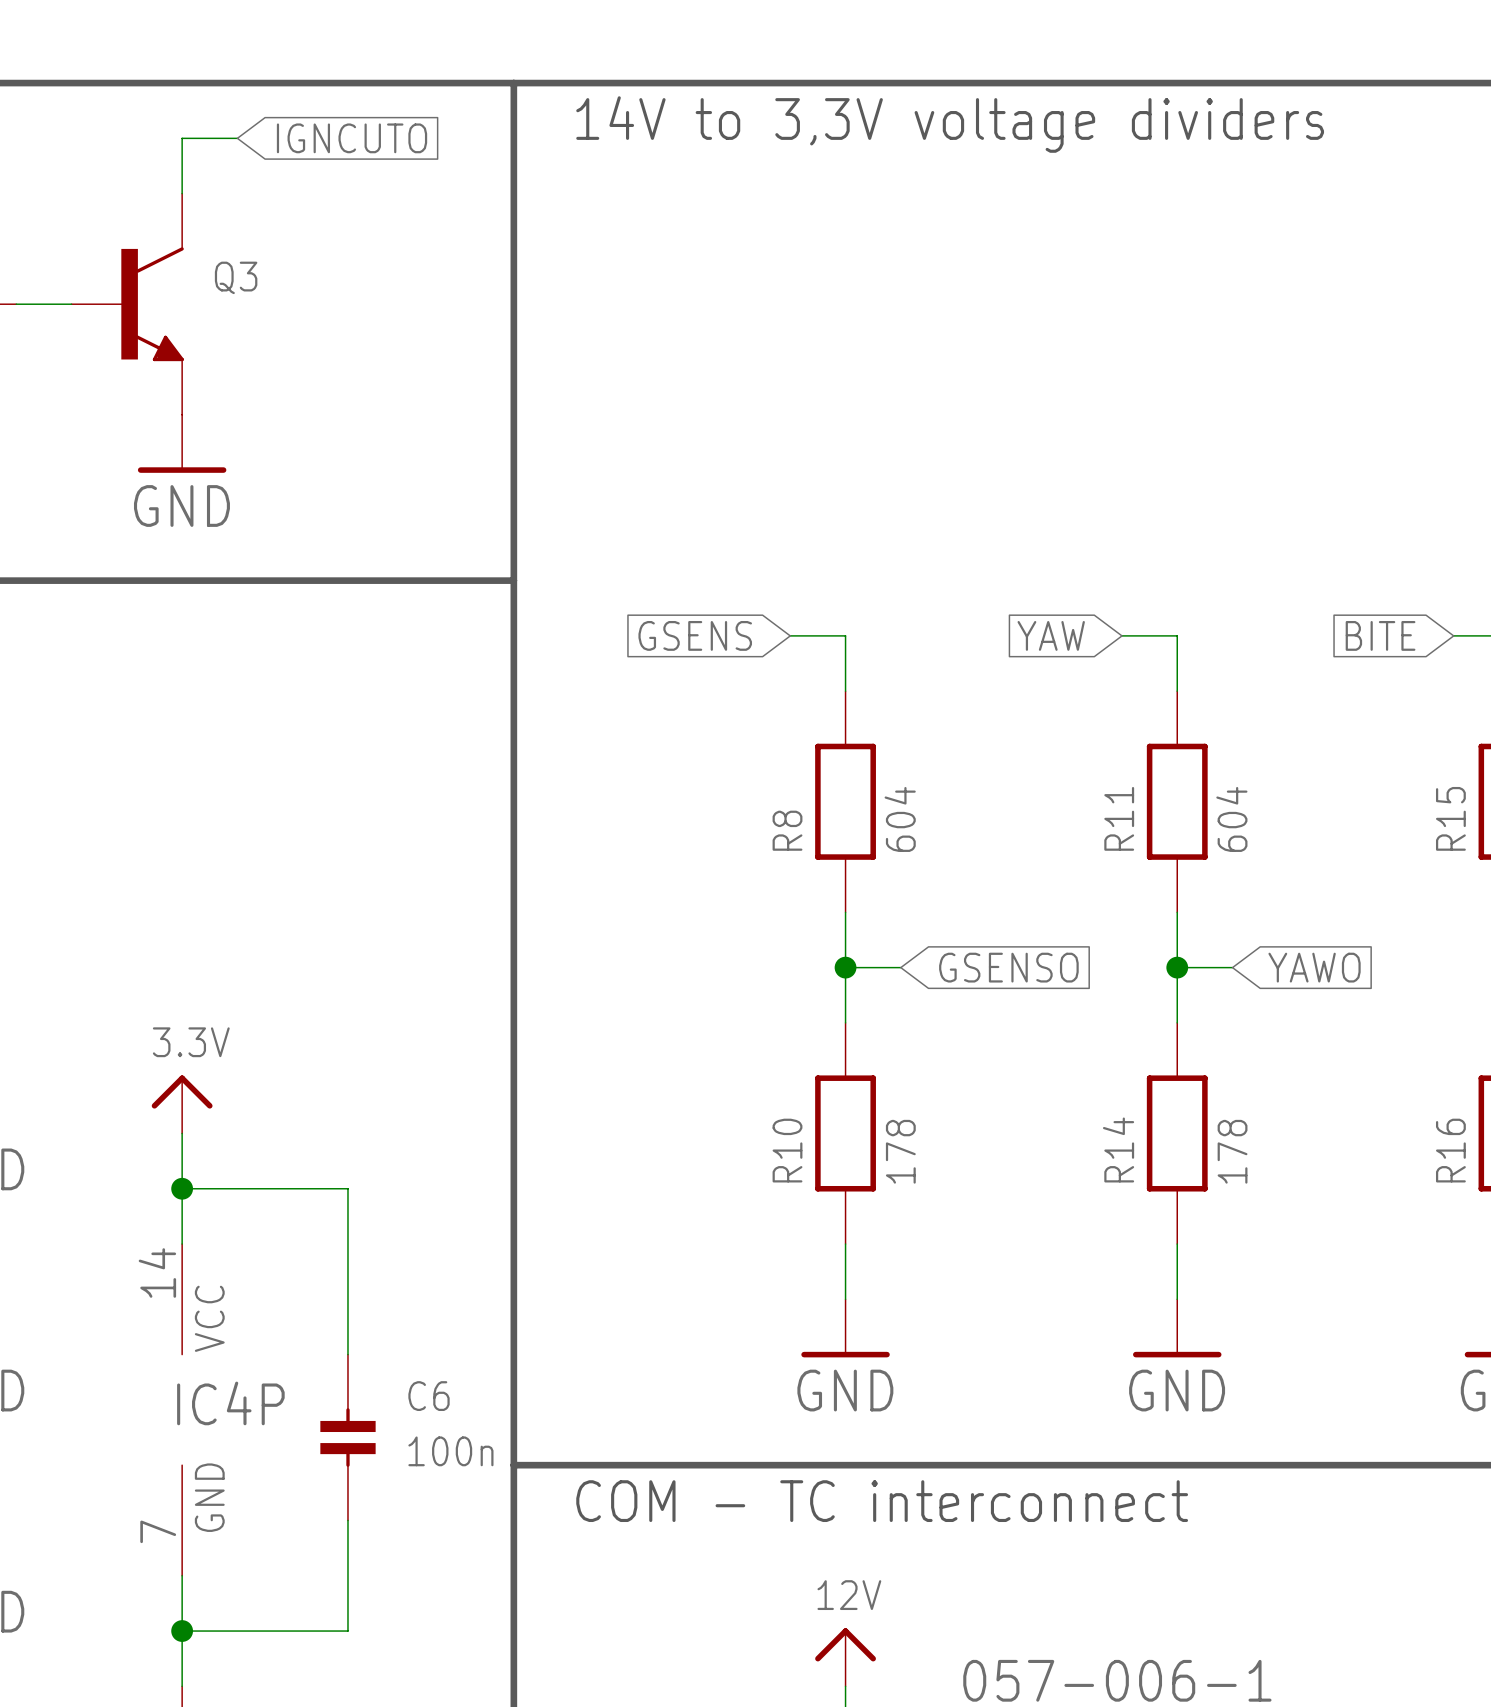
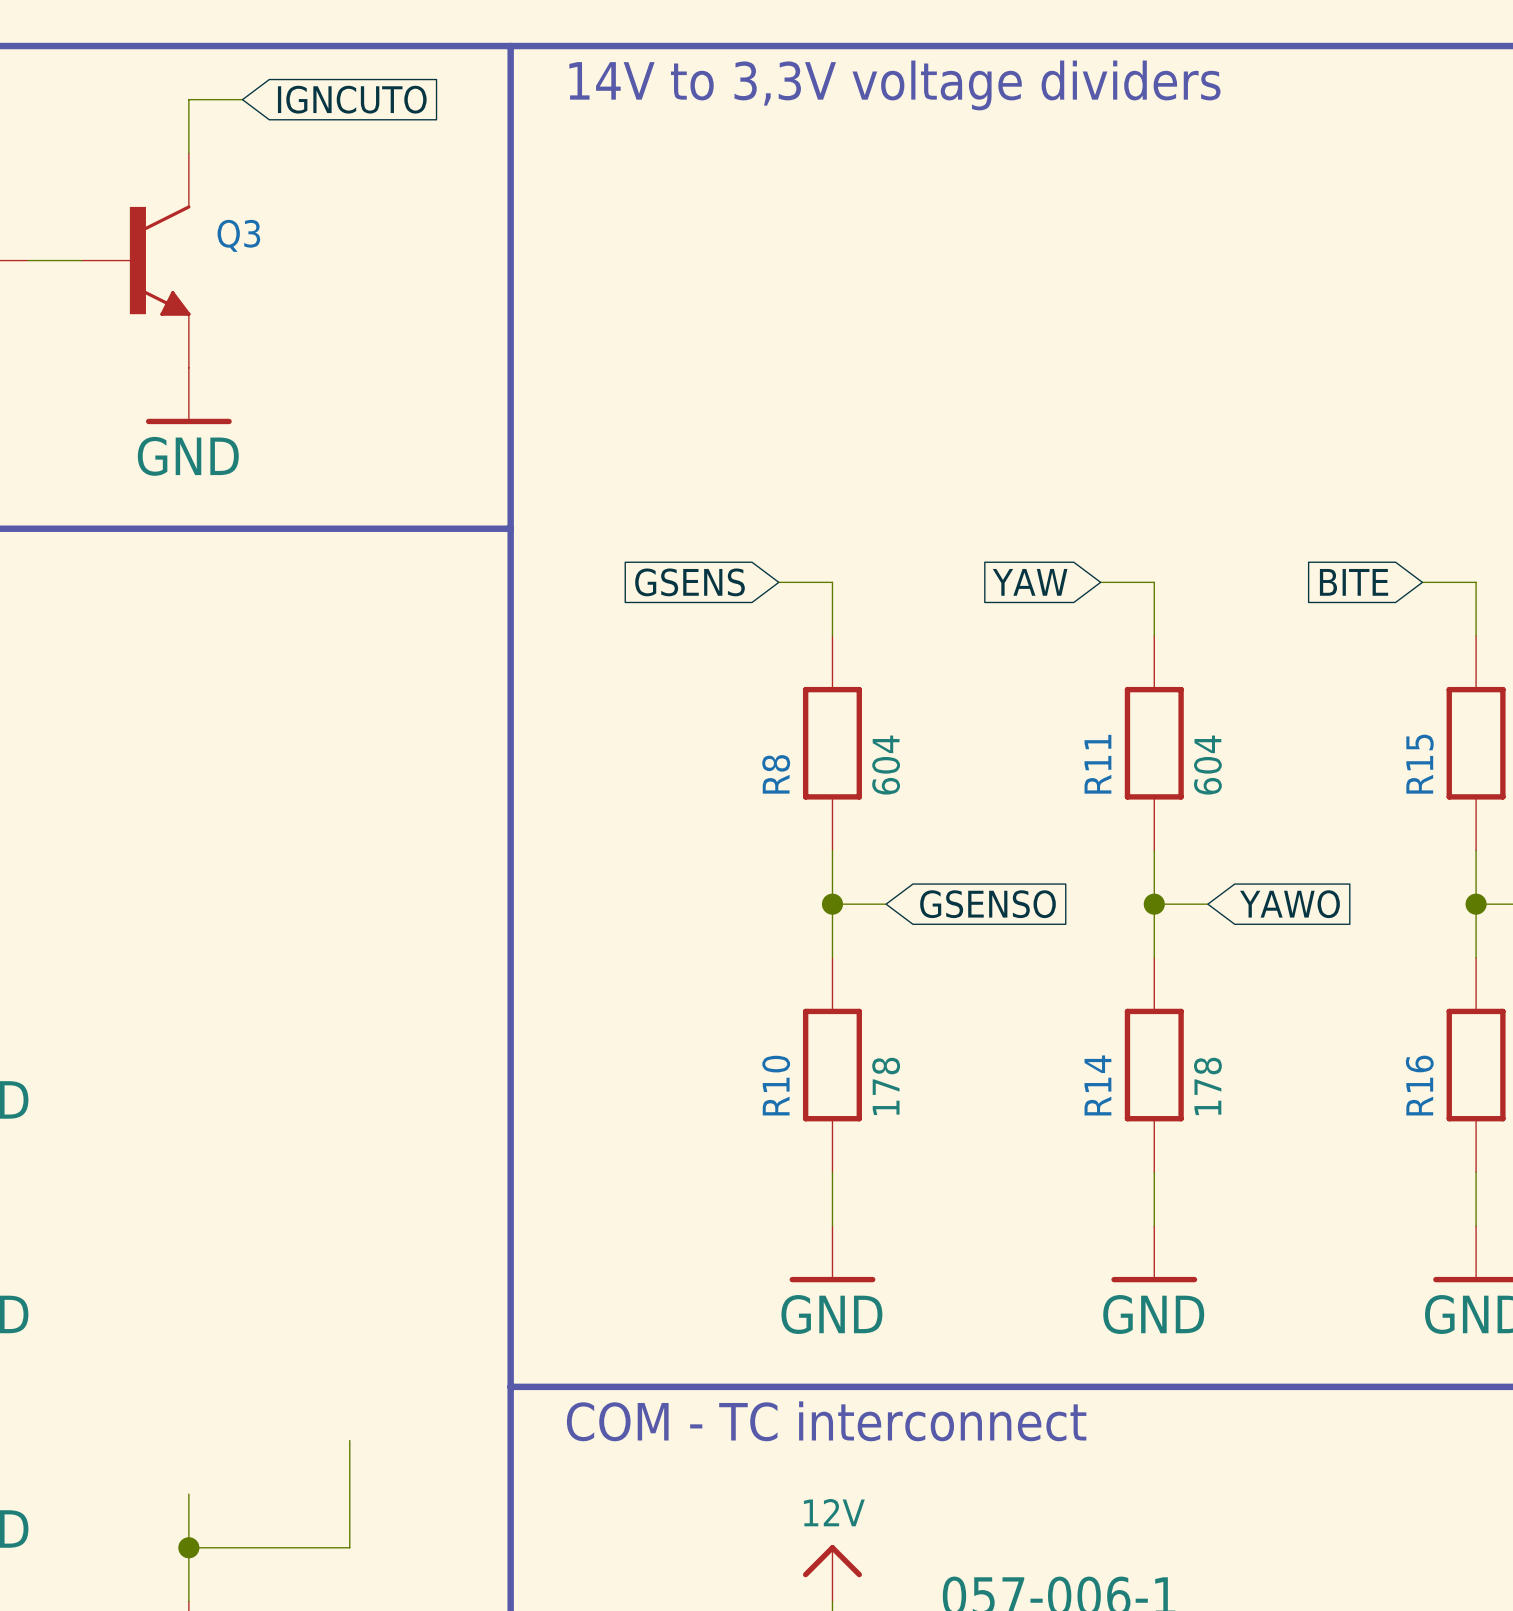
power symbol: 3.3V (182, 1104) -> none
wire: (182, 1133) (182, 1244) -> none
wire: (182, 1188) (347, 1188) (347, 1354) -> none
junction: (182, 1188) -> none
IC4P: (182, 1409) -> none
C6: 100n (347, 1437) -> none

